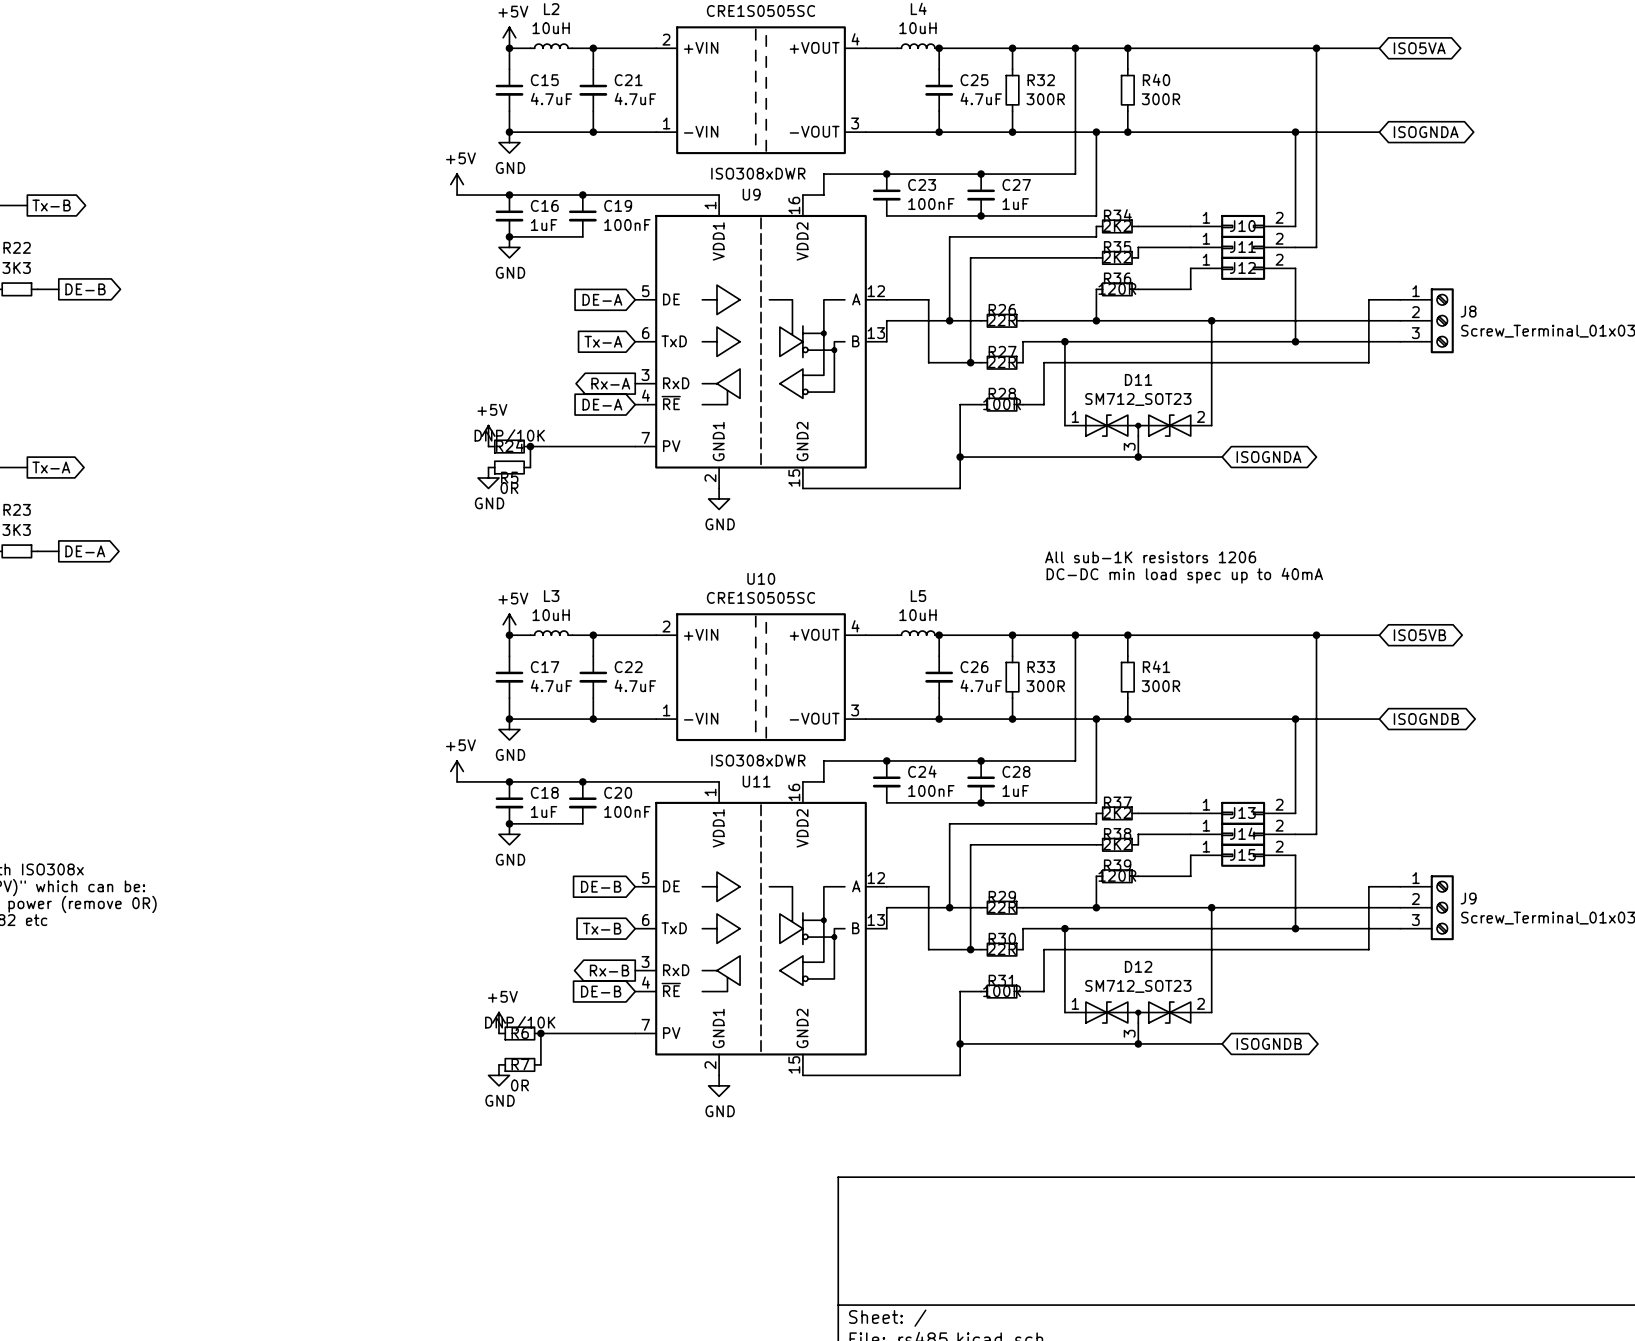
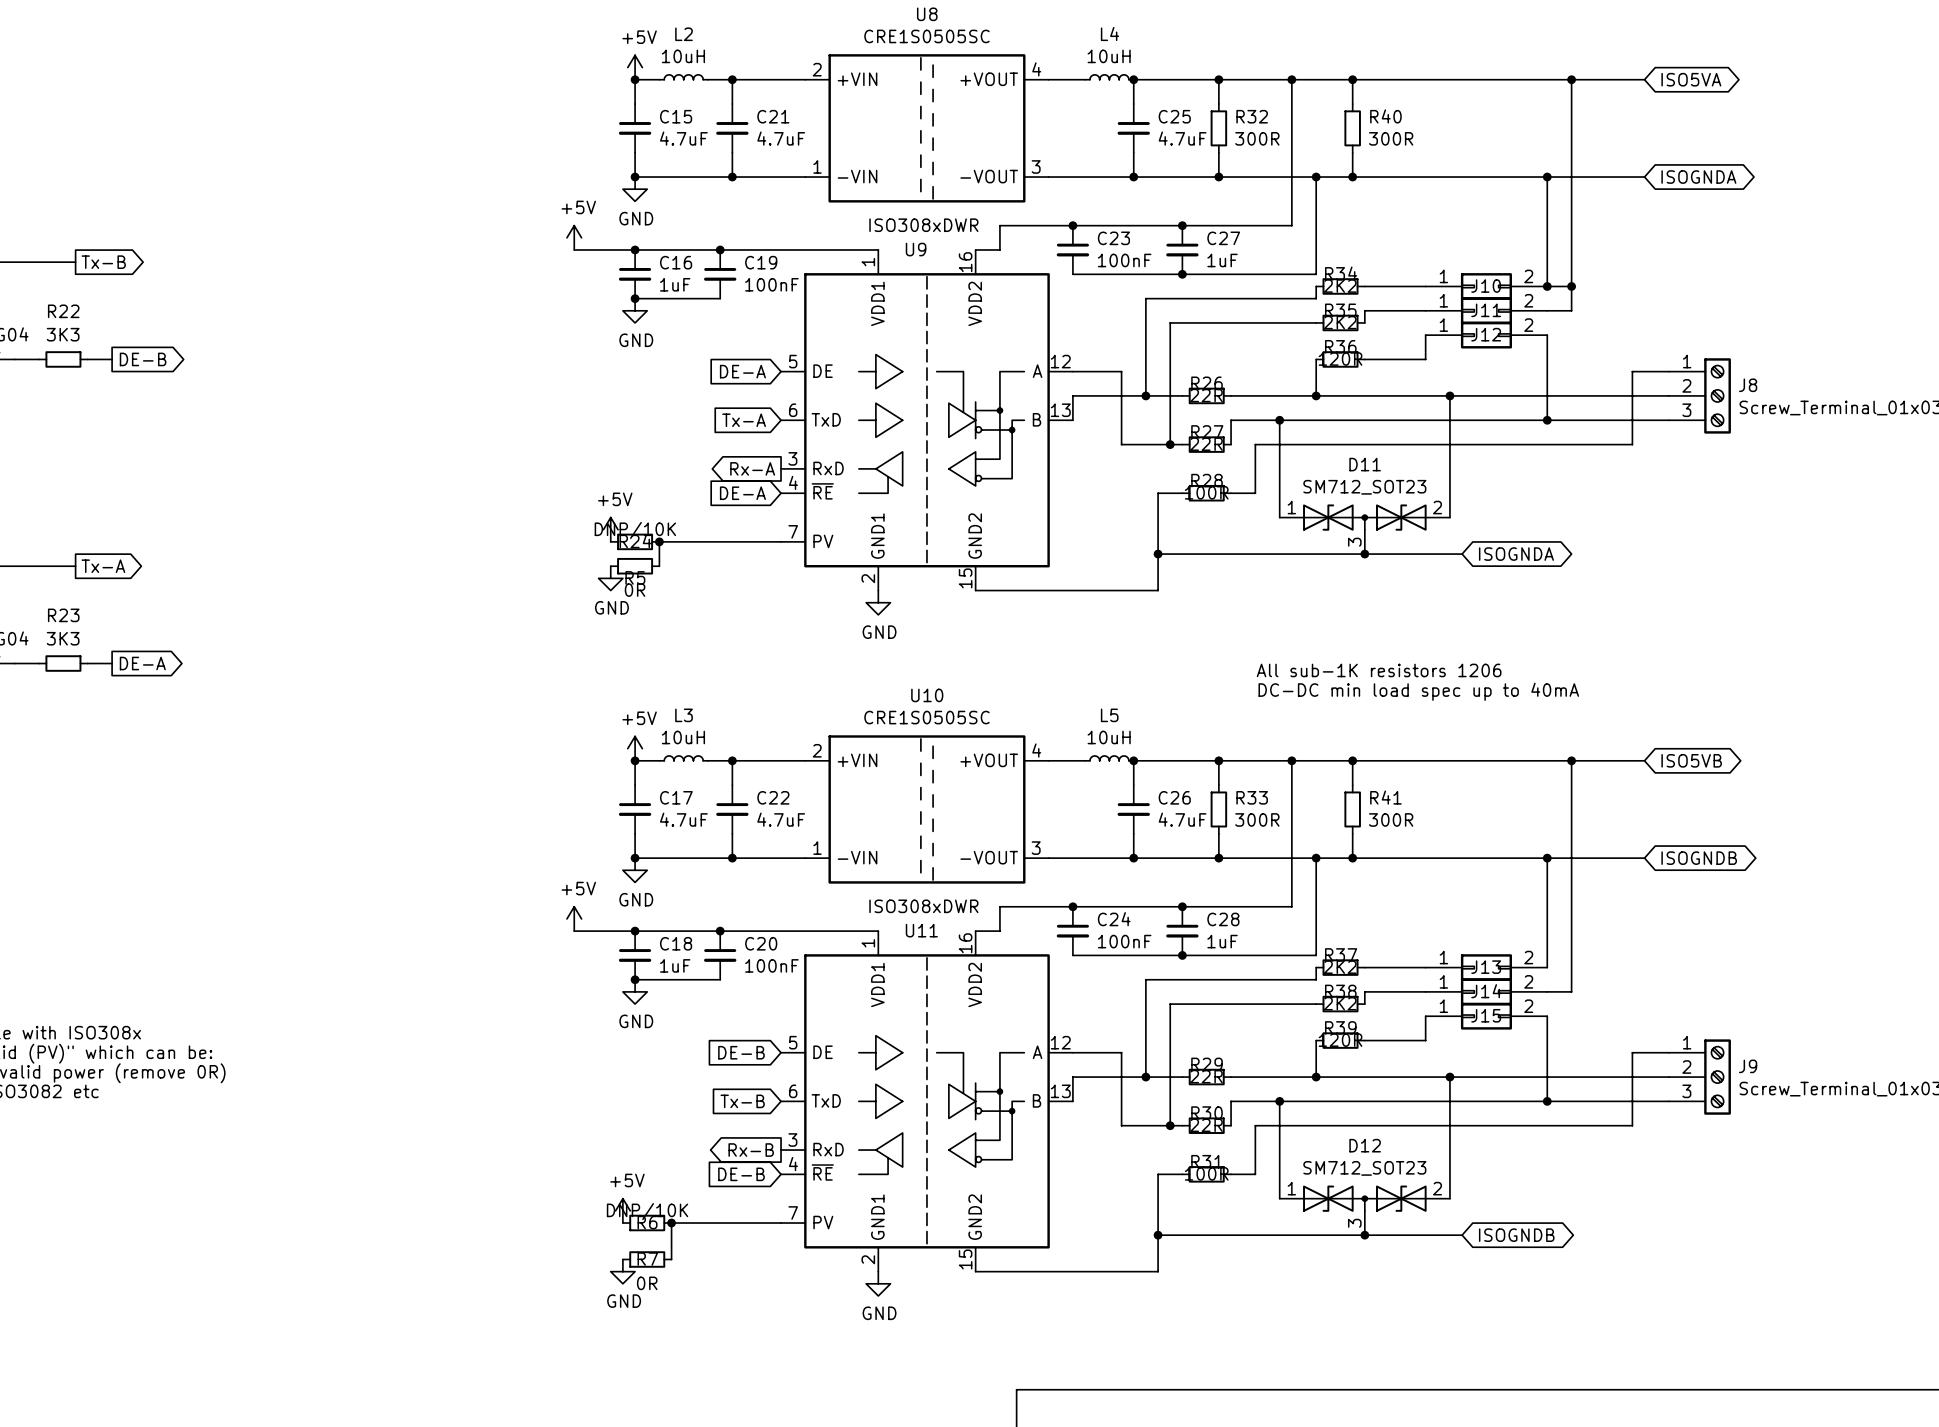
wire: none -> (1547, 286) (1571, 286)
junction: none -> (1547, 286)
junction: none -> (1571, 286)

